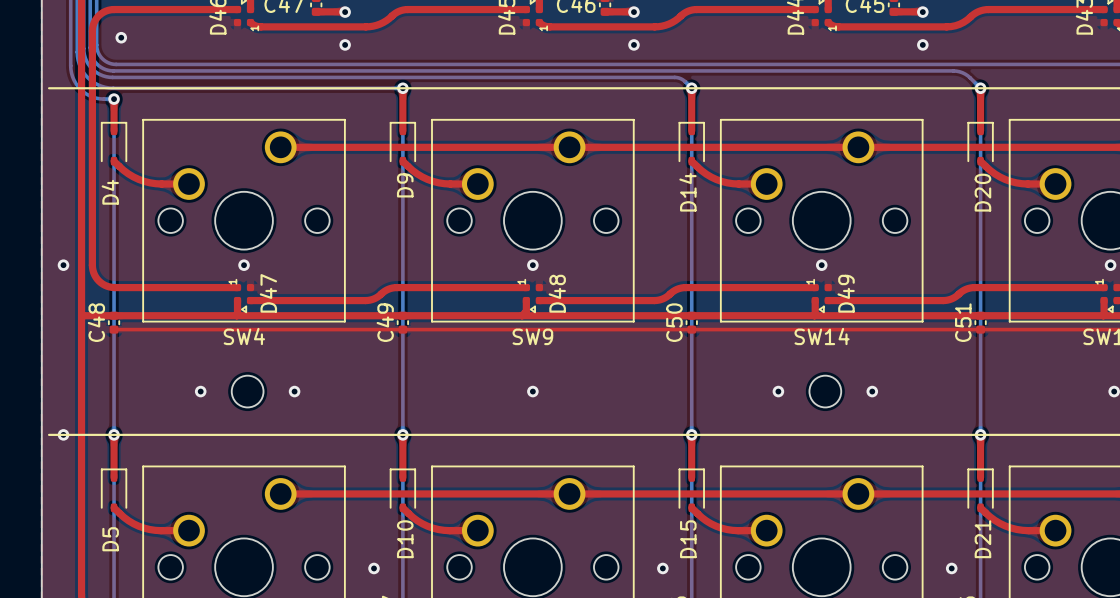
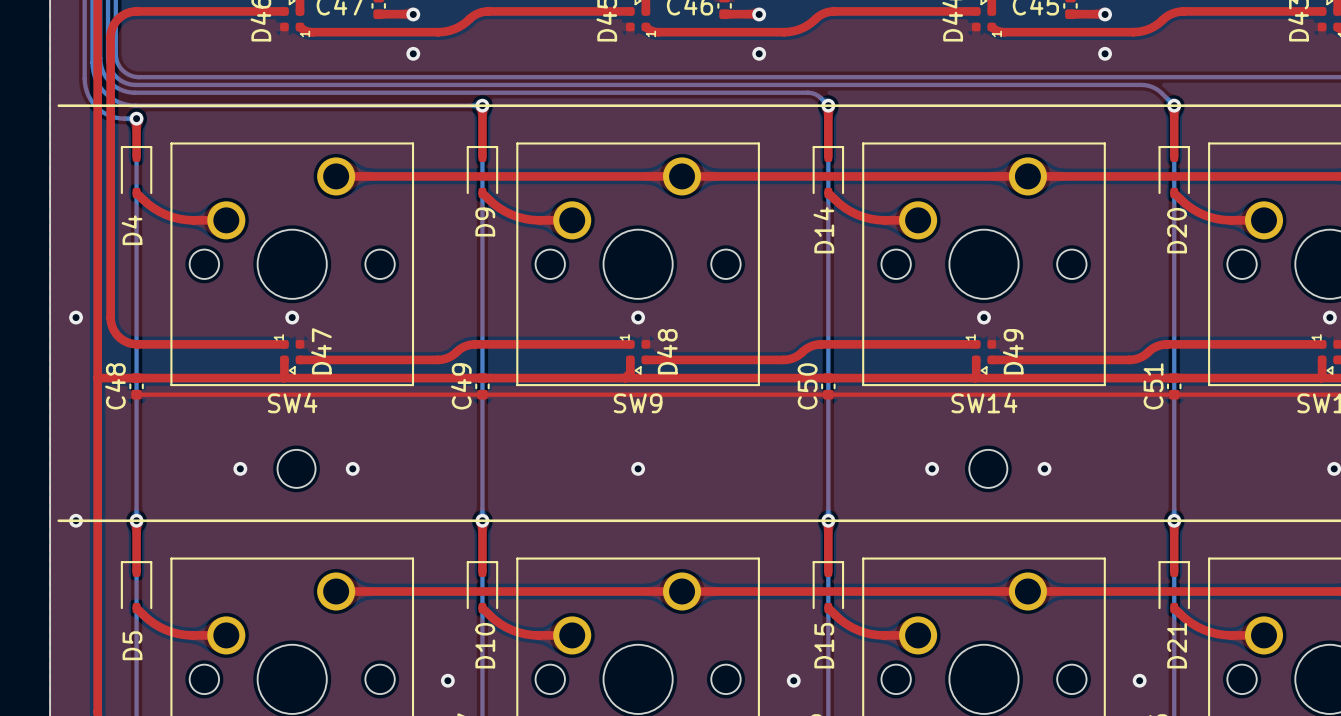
via: (121, 37) -> none

